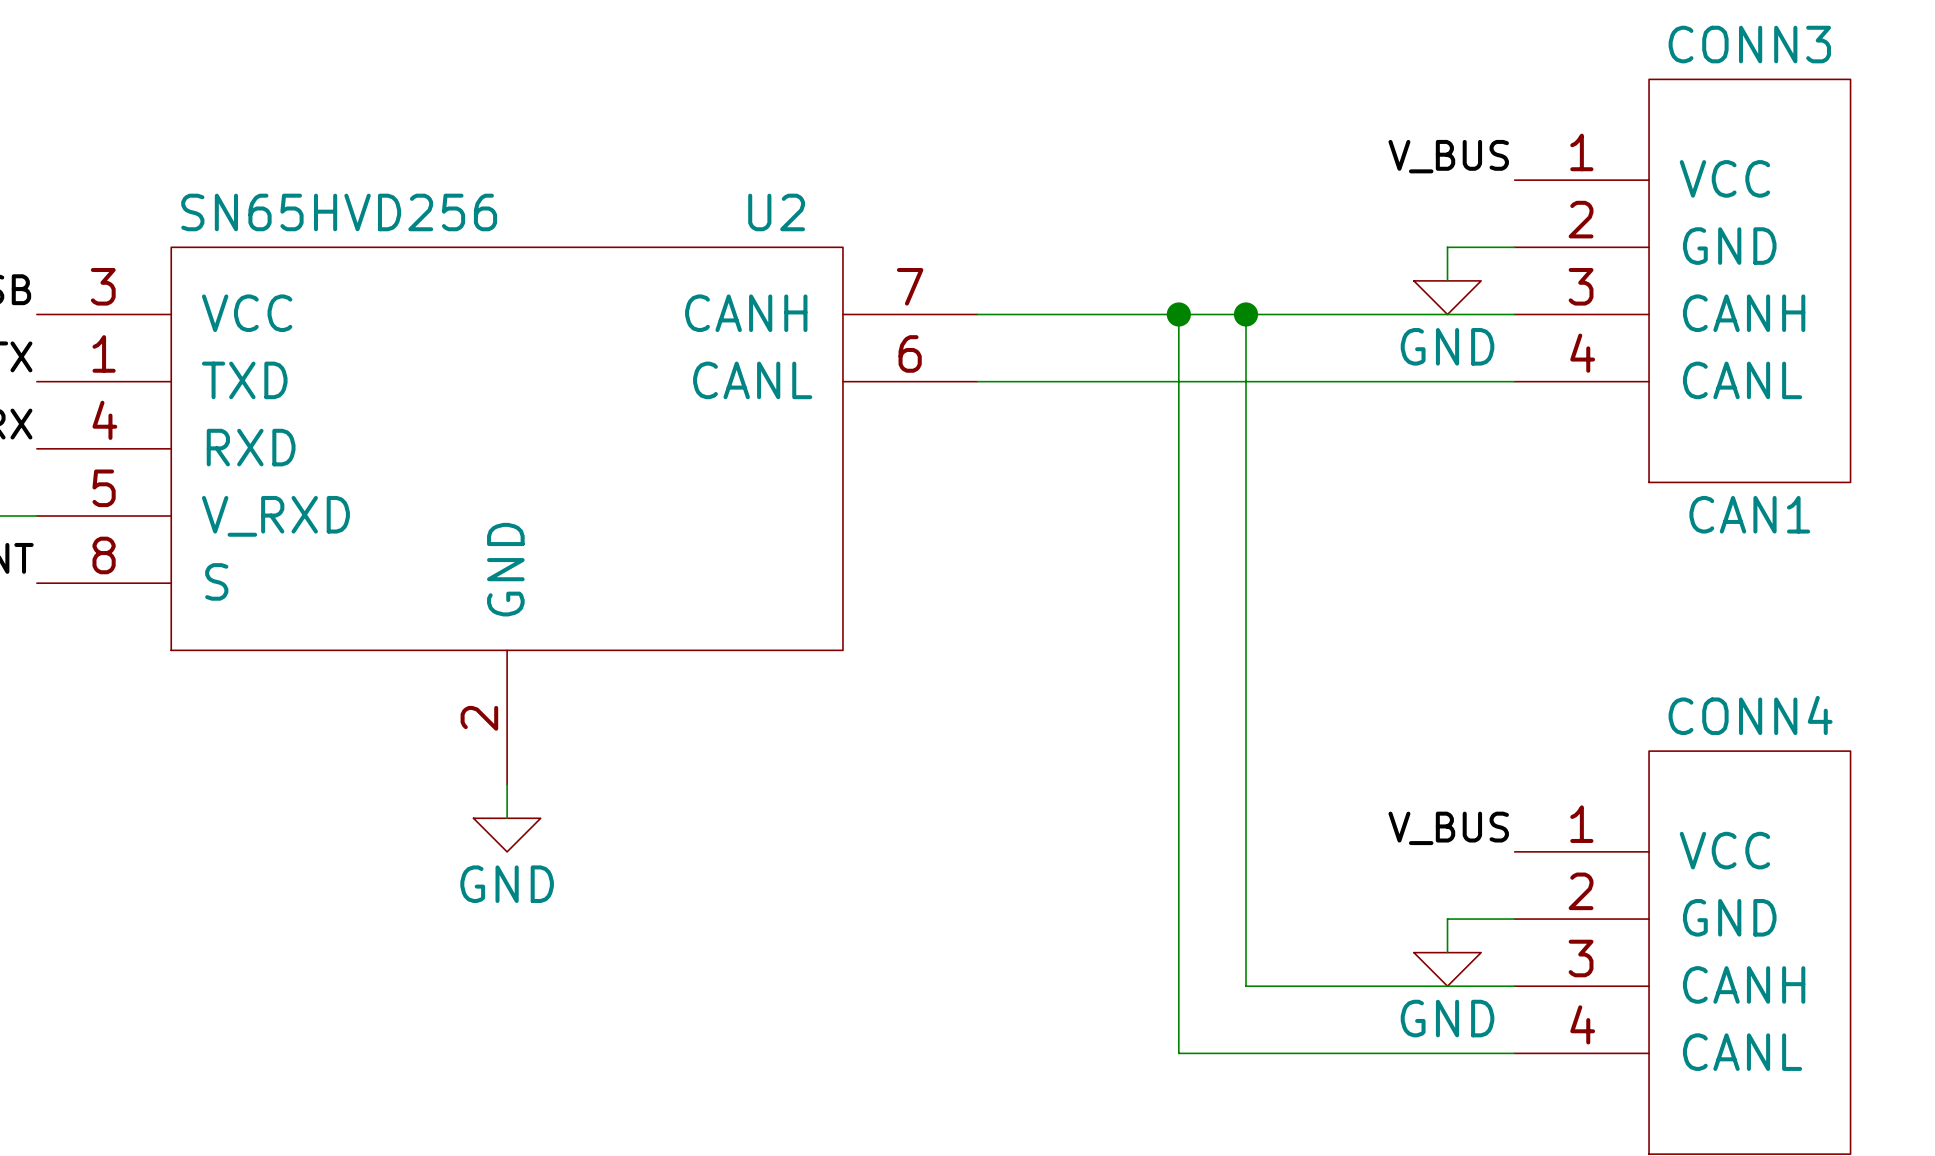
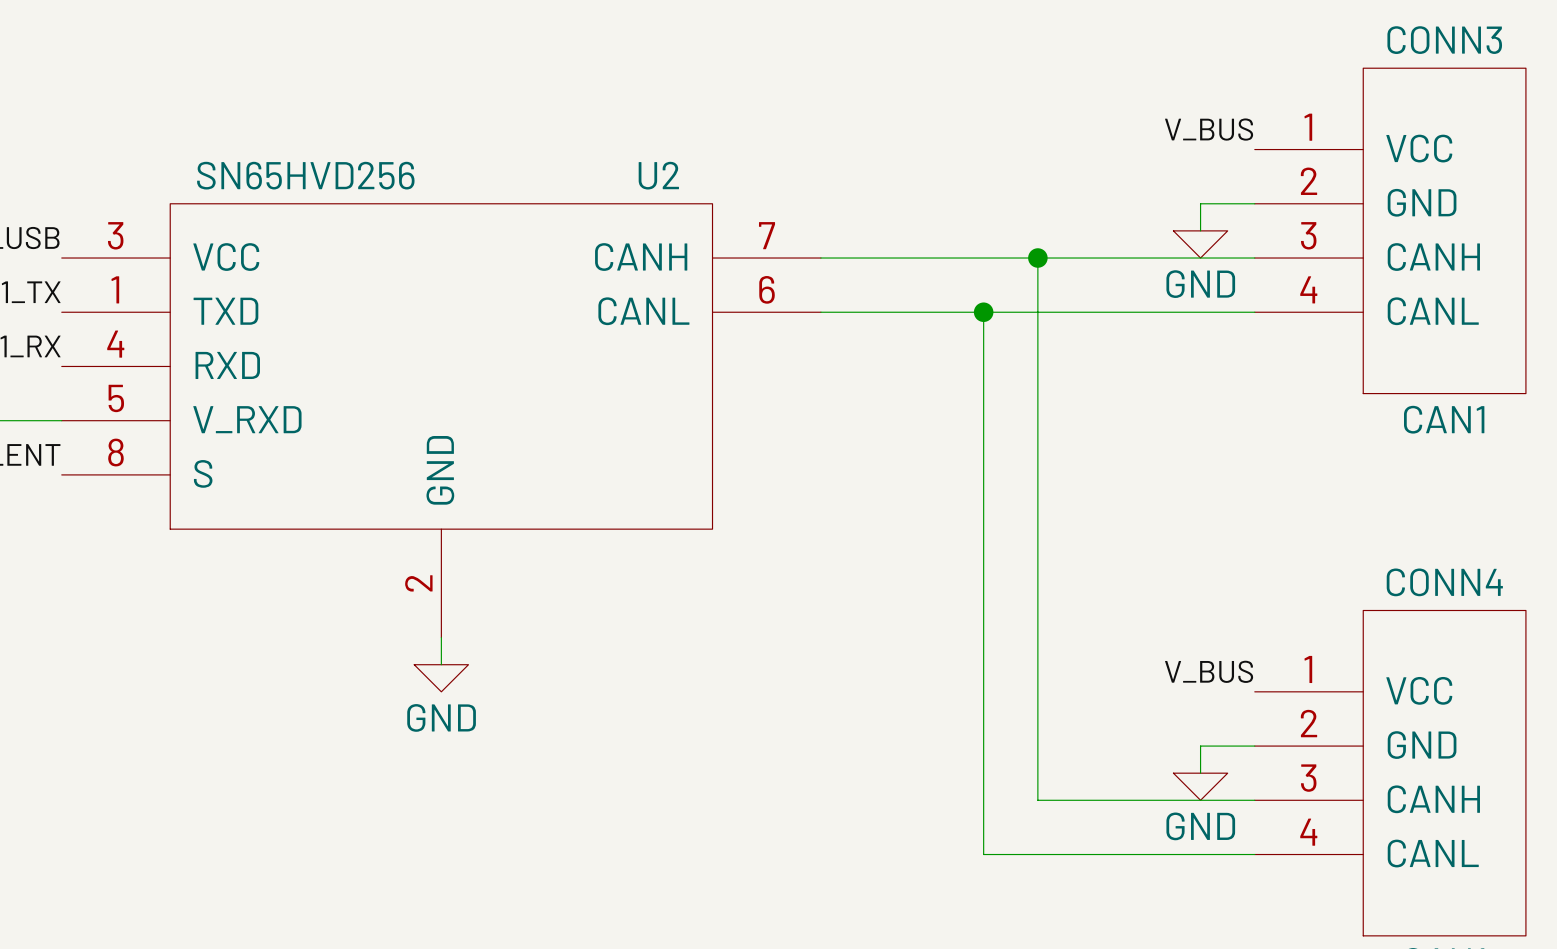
wire: (1178, 314) (1178, 381) -> none
junction position: (1178, 314) -> (983, 312)

